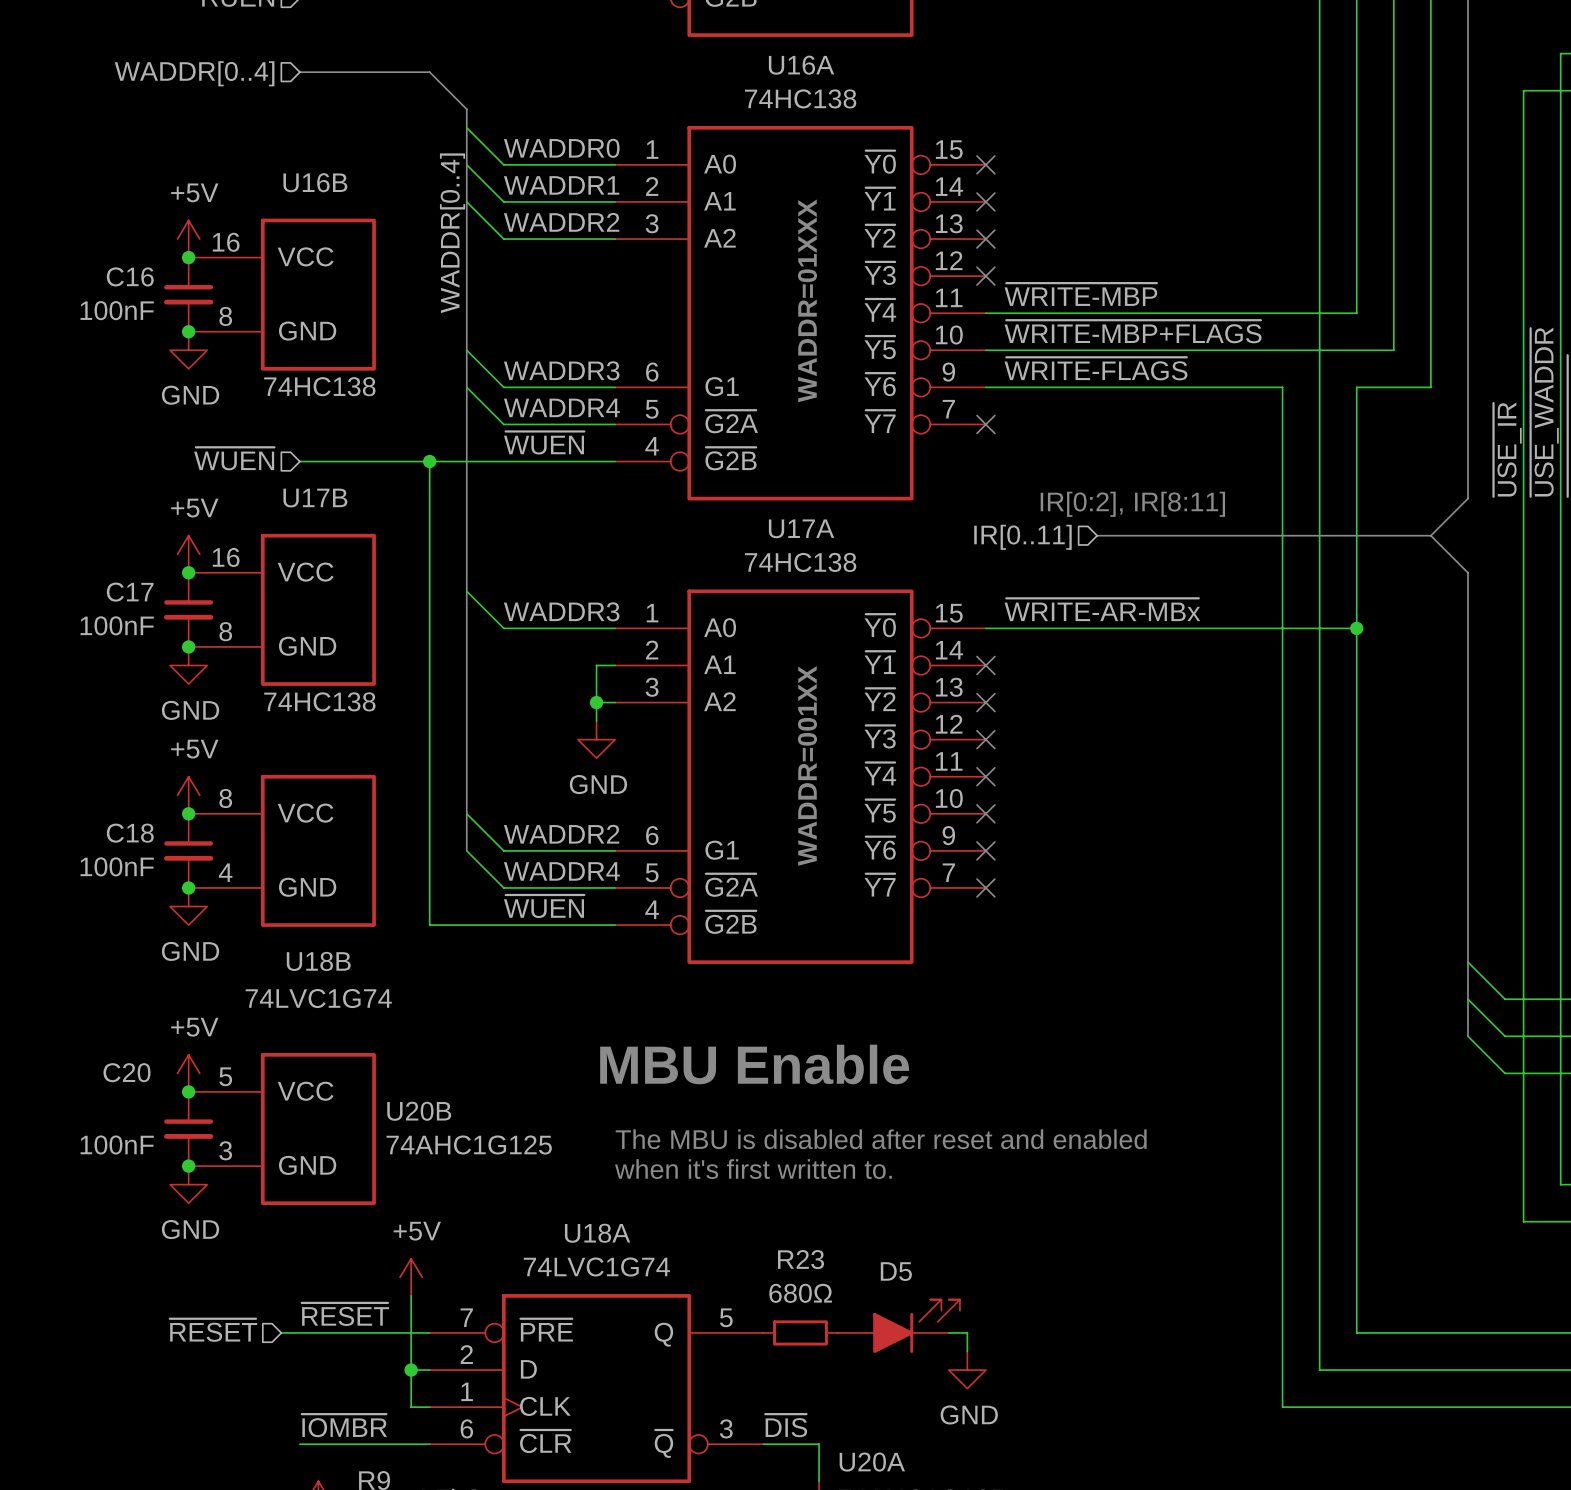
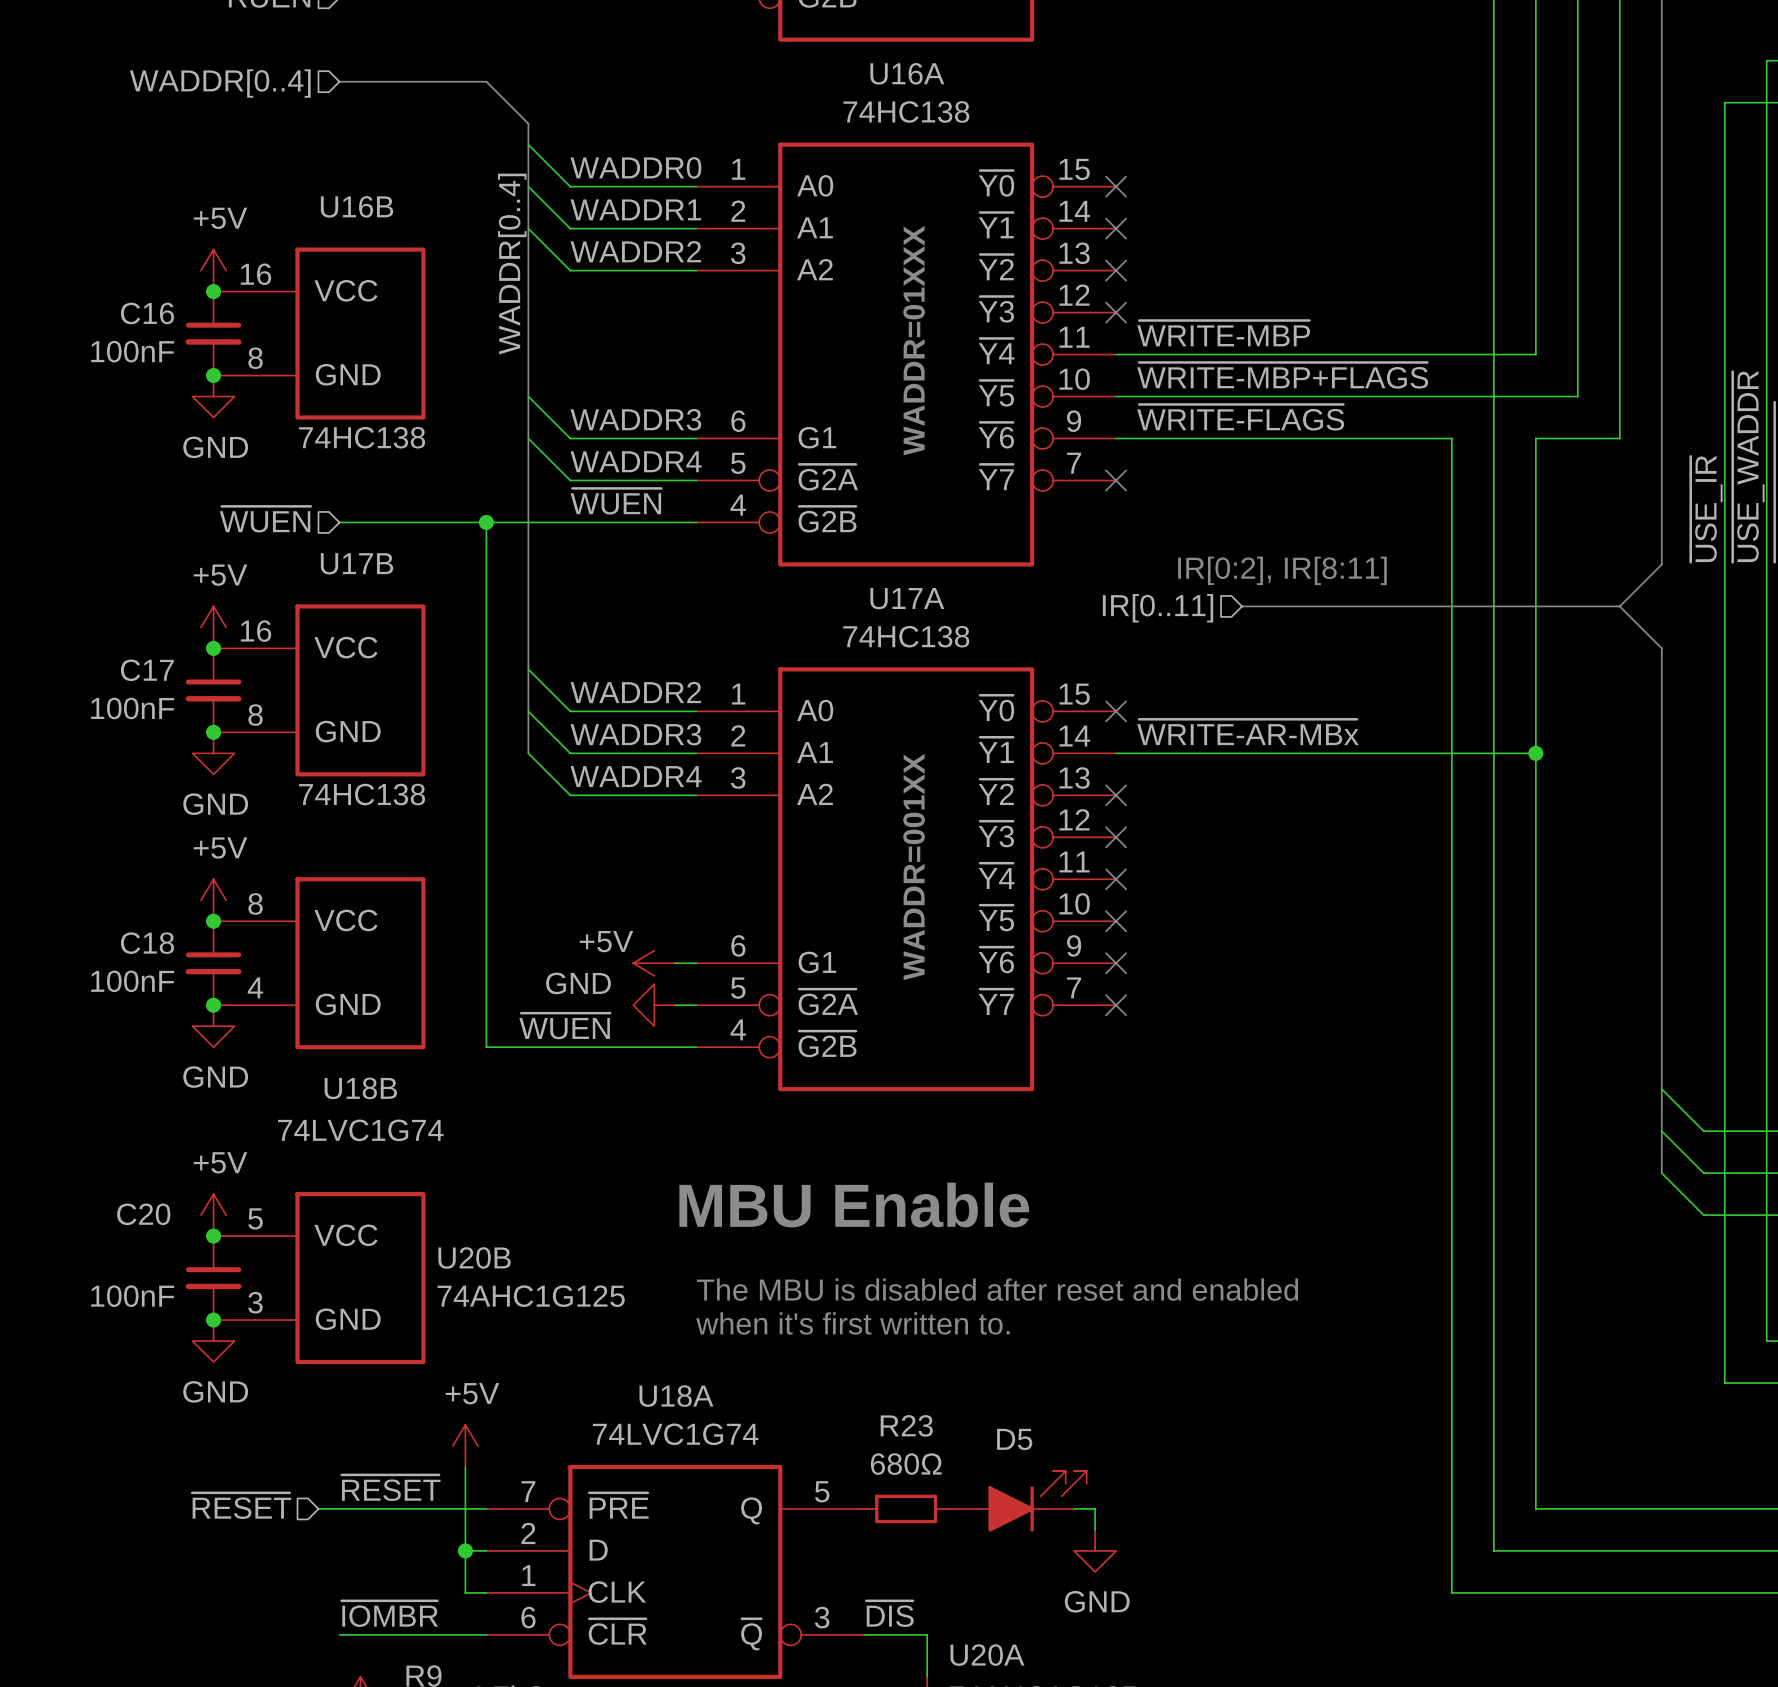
label position: ~{WRITE-AR-MBx} (1102, 609) -> ~{WRITE-AR-MBx} (1247, 732)
label: WADDR3 (561, 611) -> WADDR2 (635, 692)
wire: (985, 628) (1356, 628) -> (1116, 753) (1535, 753)
junction position: (1356, 628) -> (1535, 753)
label: none -> WADDR3 (635, 734)
bus: (466, 665) (466, 850) -> none
wire: (596, 665) (596, 721) -> (675, 753) (570, 753) (528, 711)
no-connect mark position: (985, 665) -> (1116, 711)
junction: (596, 702) -> none
power symbol rotation: 0° (596, 739) -> 90° clockwise (654, 1005)
power symbol position: GND (596, 739) -> GND (654, 1005)
power symbol text position: GND (598, 784) -> GND (578, 983)
wire: (466, 813) (503, 850) (596, 850) -> none
label: WADDR2 (561, 834) -> none
wire: (466, 850) (503, 887) (596, 887) -> (528, 753) (570, 795) (675, 795)
power symbol: none -> +5V (654, 963)
label position: WADDR4 (561, 871) -> WADDR4 (636, 776)
label position: ~{WUEN} (544, 906) -> ~{WUEN} (564, 1026)

